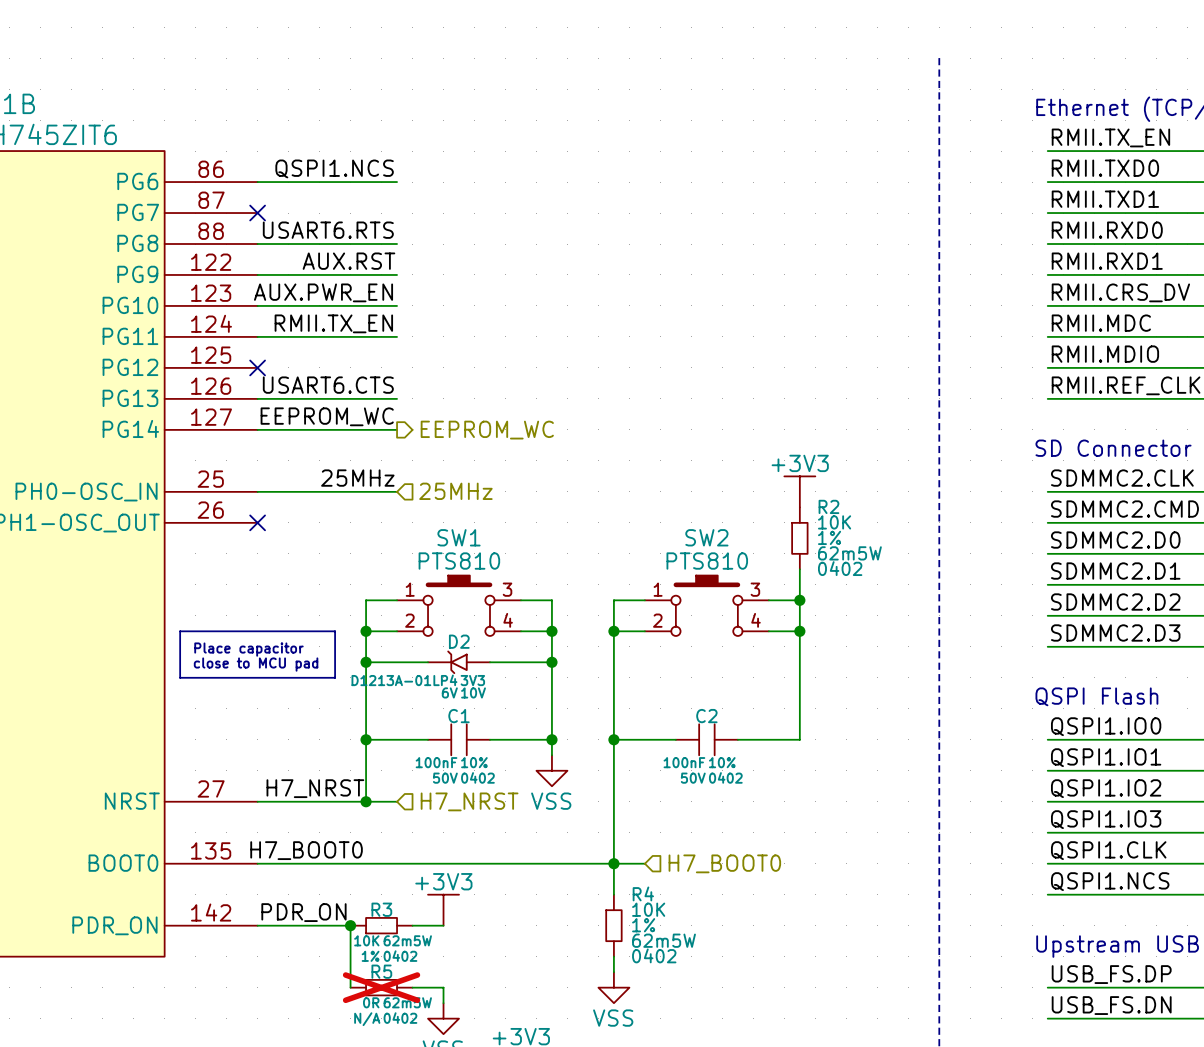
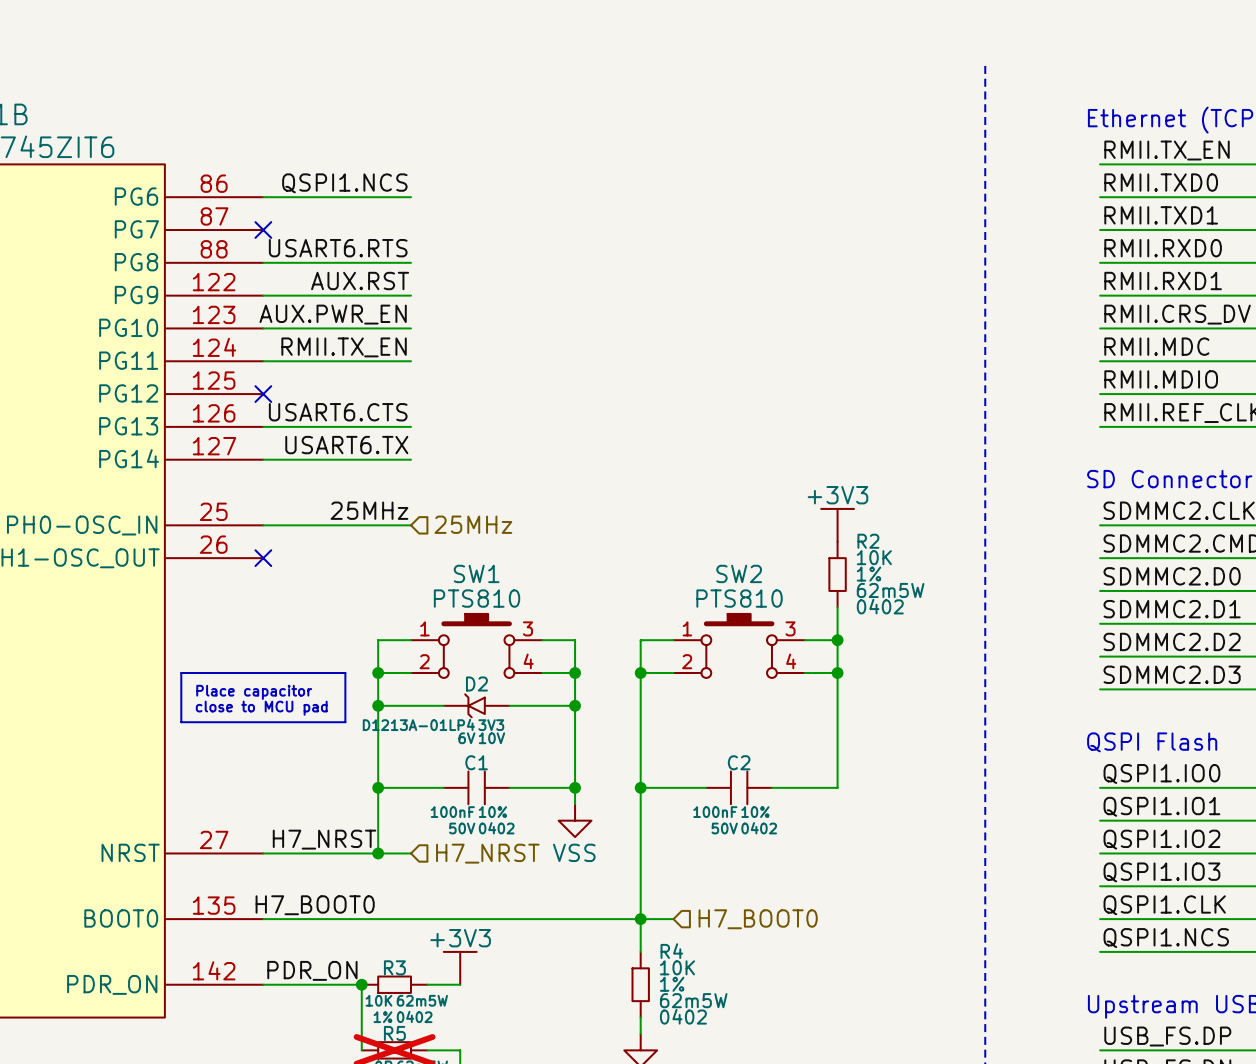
label: EEPROM_WC (327, 416) -> USART6.TX (346, 445)
hierarchical label: EEPROM_WC (487, 430) -> none

